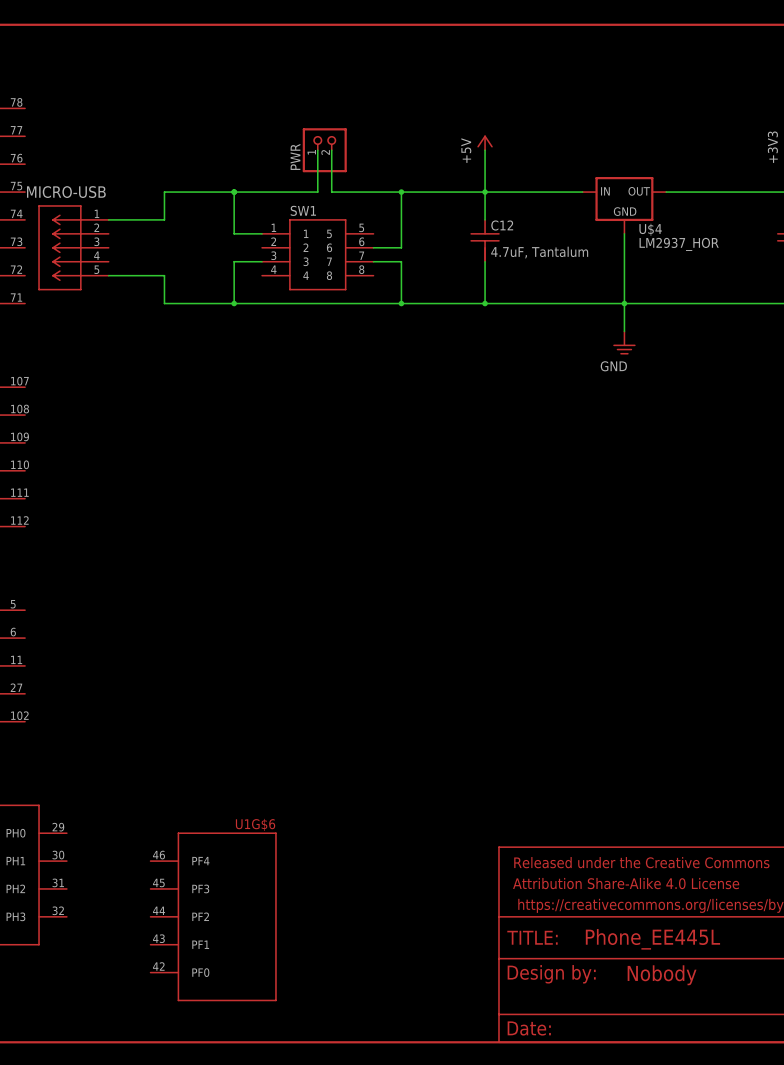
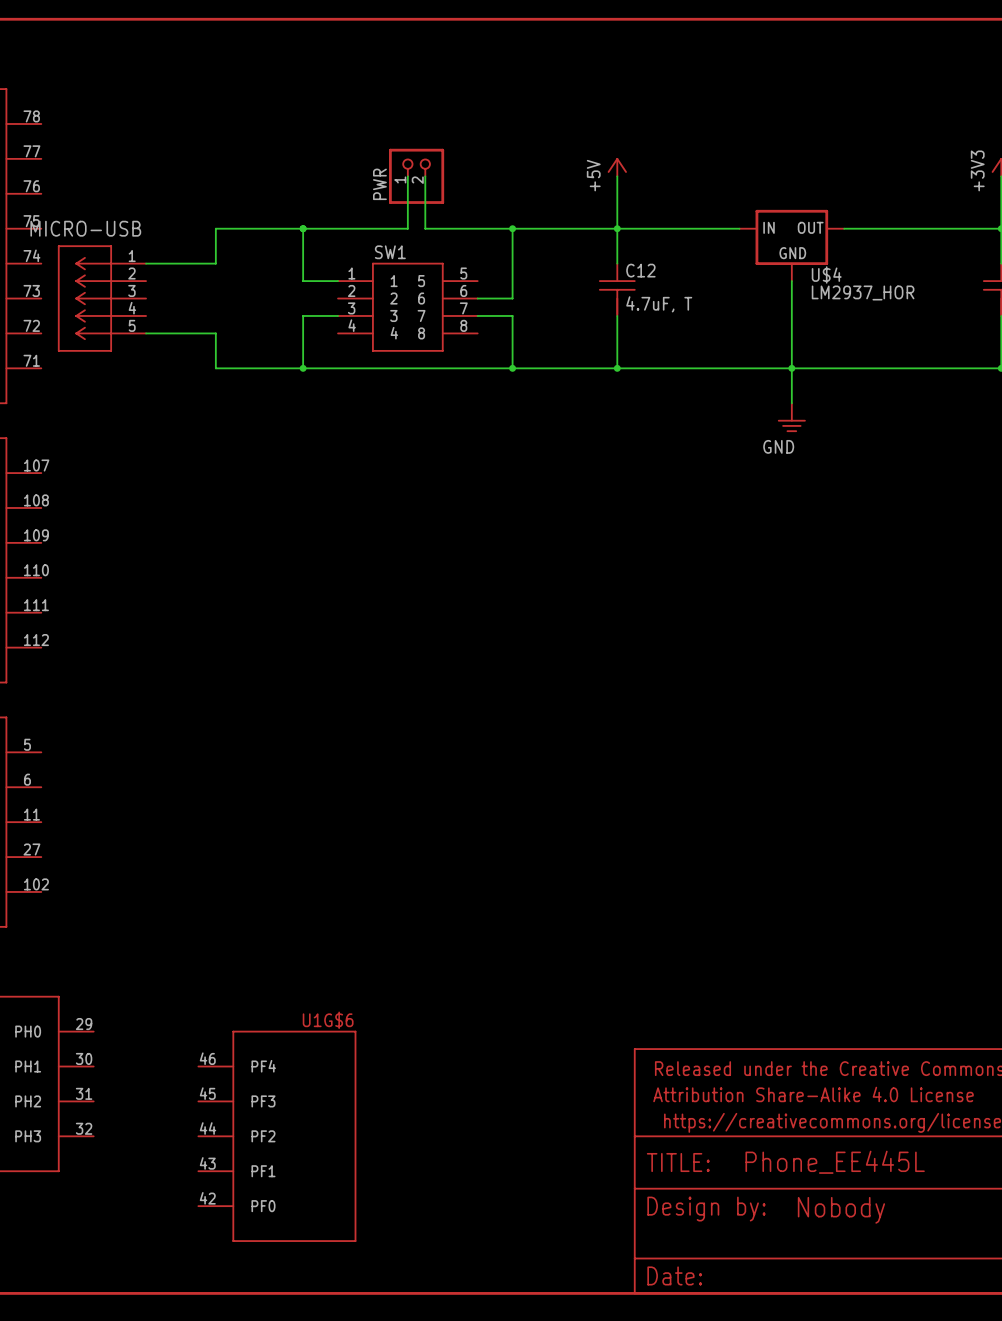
C12 value: 4.7uF, Tantalum (539, 252) -> 4.7uF, T (659, 304)

